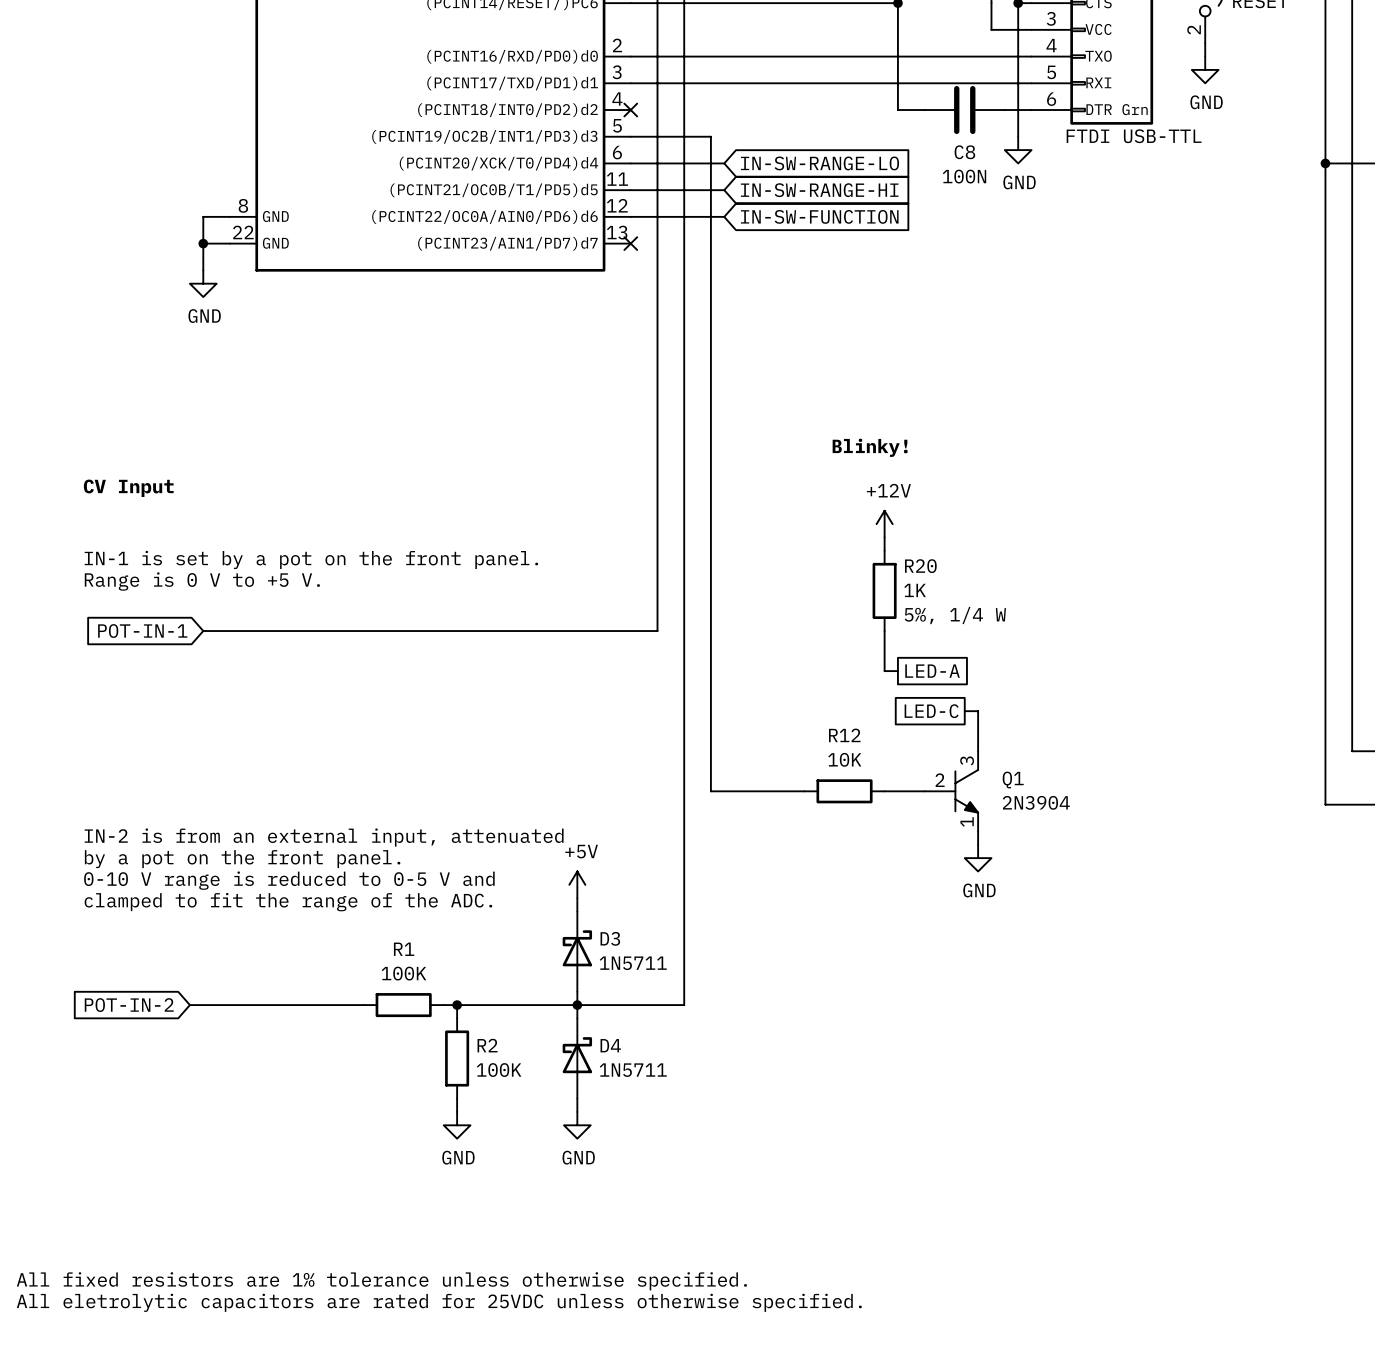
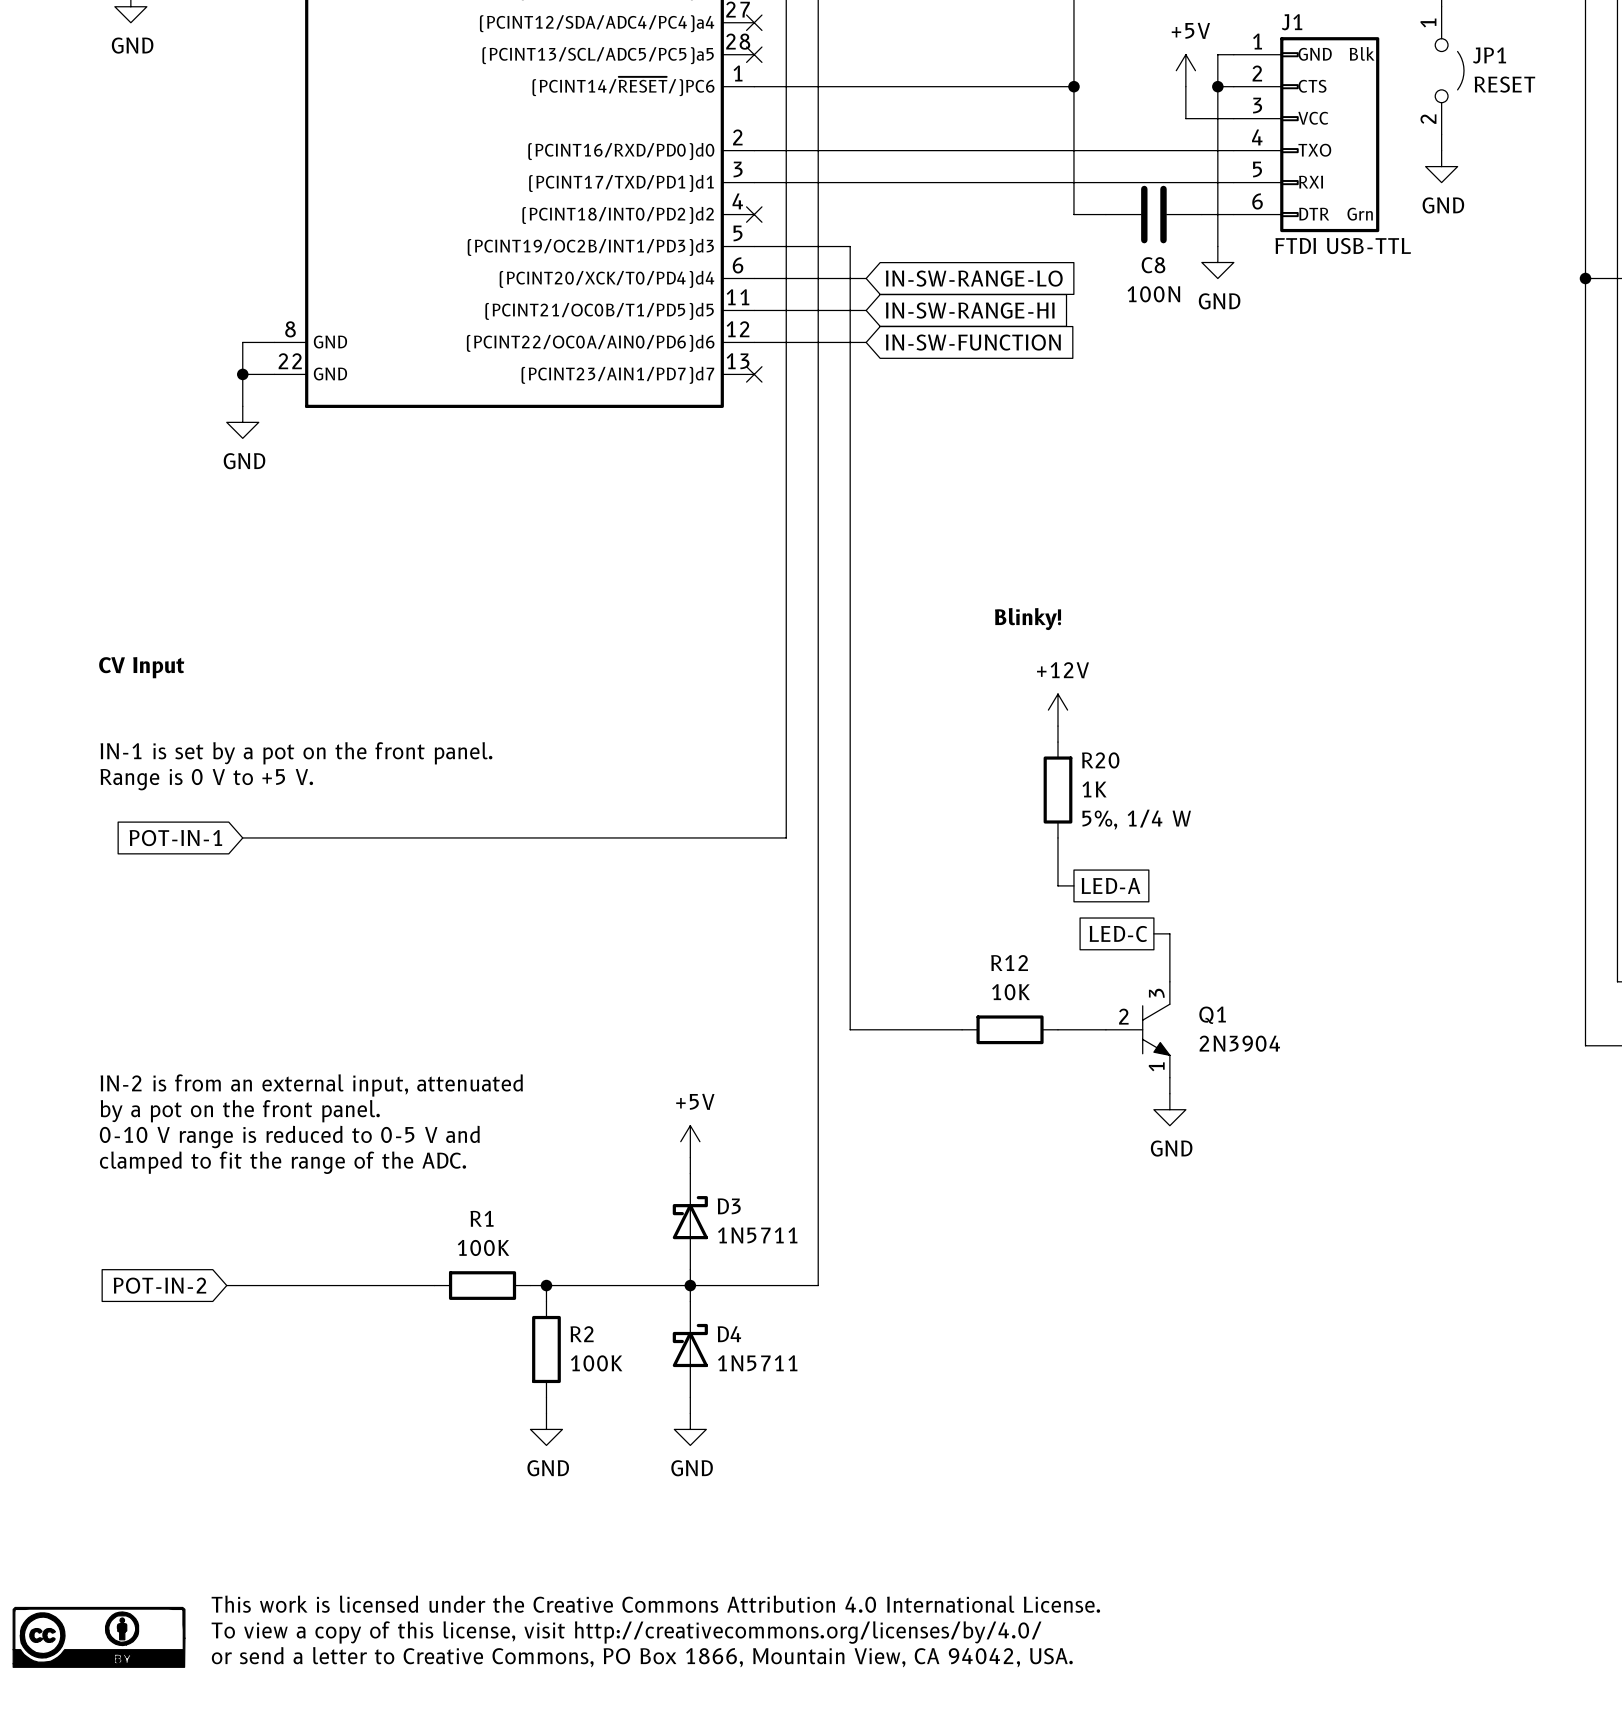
text: none -> This work is licensed under the Creative Commons Attribution 4.0 International License. (655, 1604)
text: All fixed resistors are 1% tolerance unless otherwise specified. (381, 1281) -> none
text: none -> To view a copy of this license, visit http://creativecommons.org/licenses/by/4.0/ (626, 1632)
power symbol: none -> (99, 1637)
text: All eletrolytic capacitors are rated for 25VDC unless otherwise specified. (439, 1302) -> none
text: none -> or send a letter to Creative Commons, PO Box 1866, Mountain View, CA 94042, USA. (642, 1657)

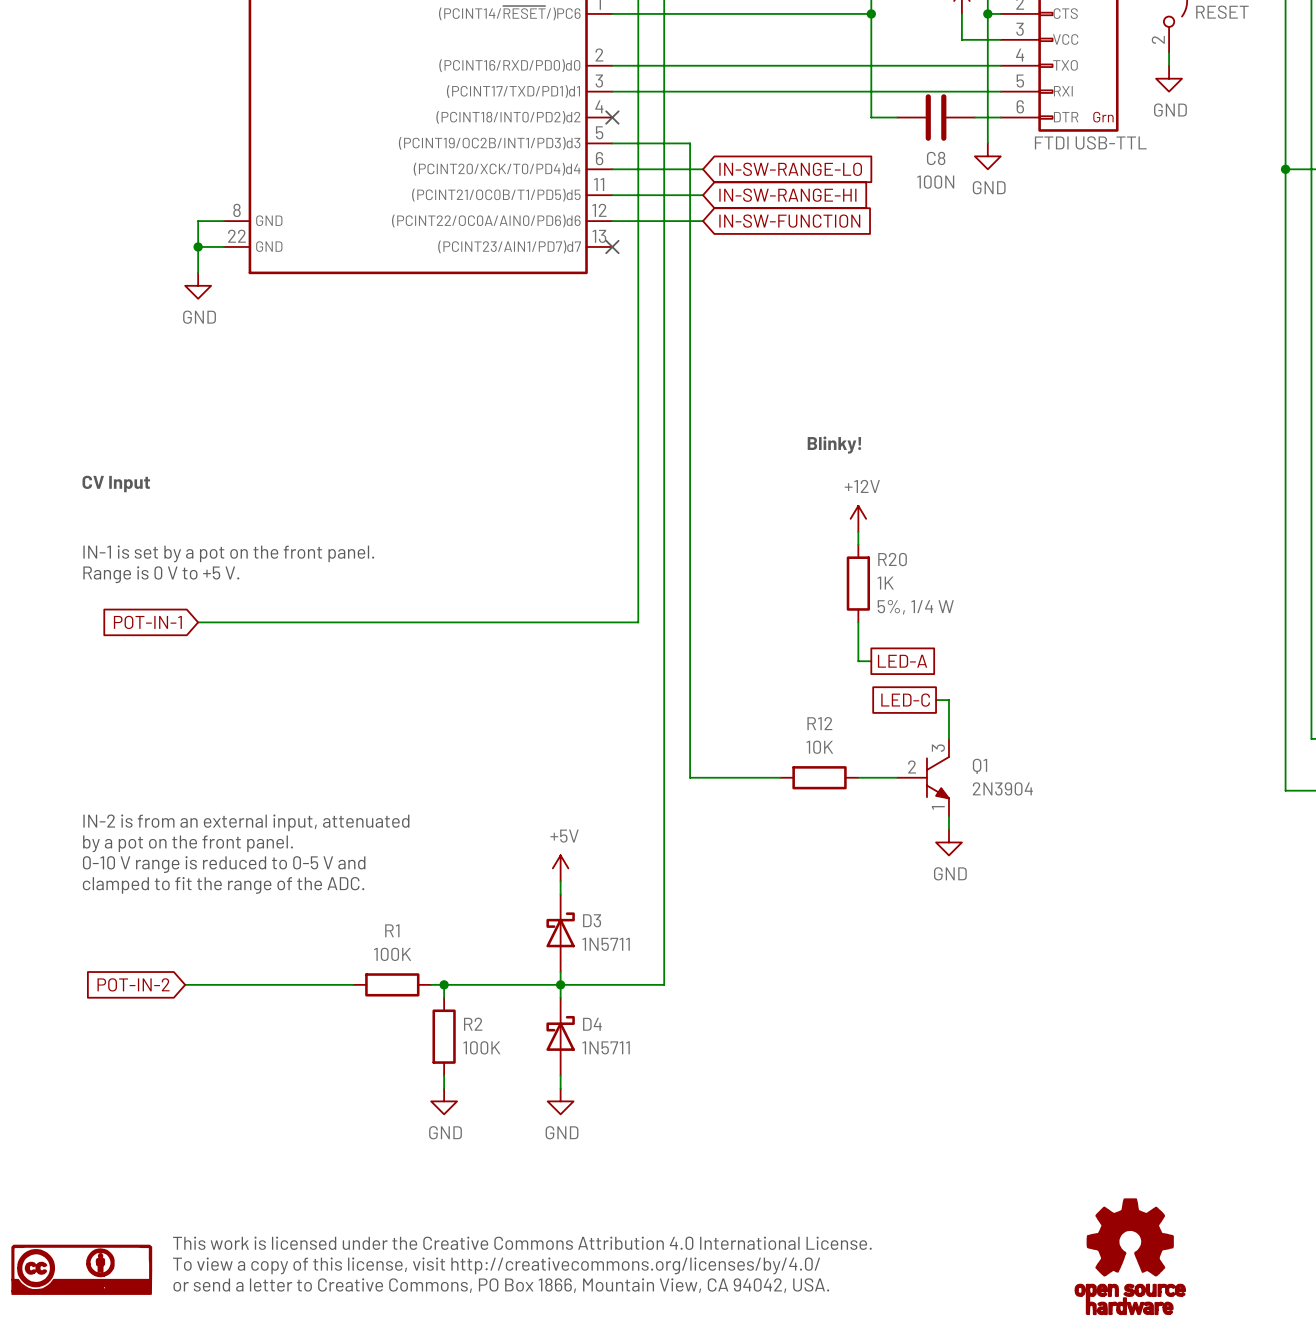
power symbol: none -> (1130, 1256)

